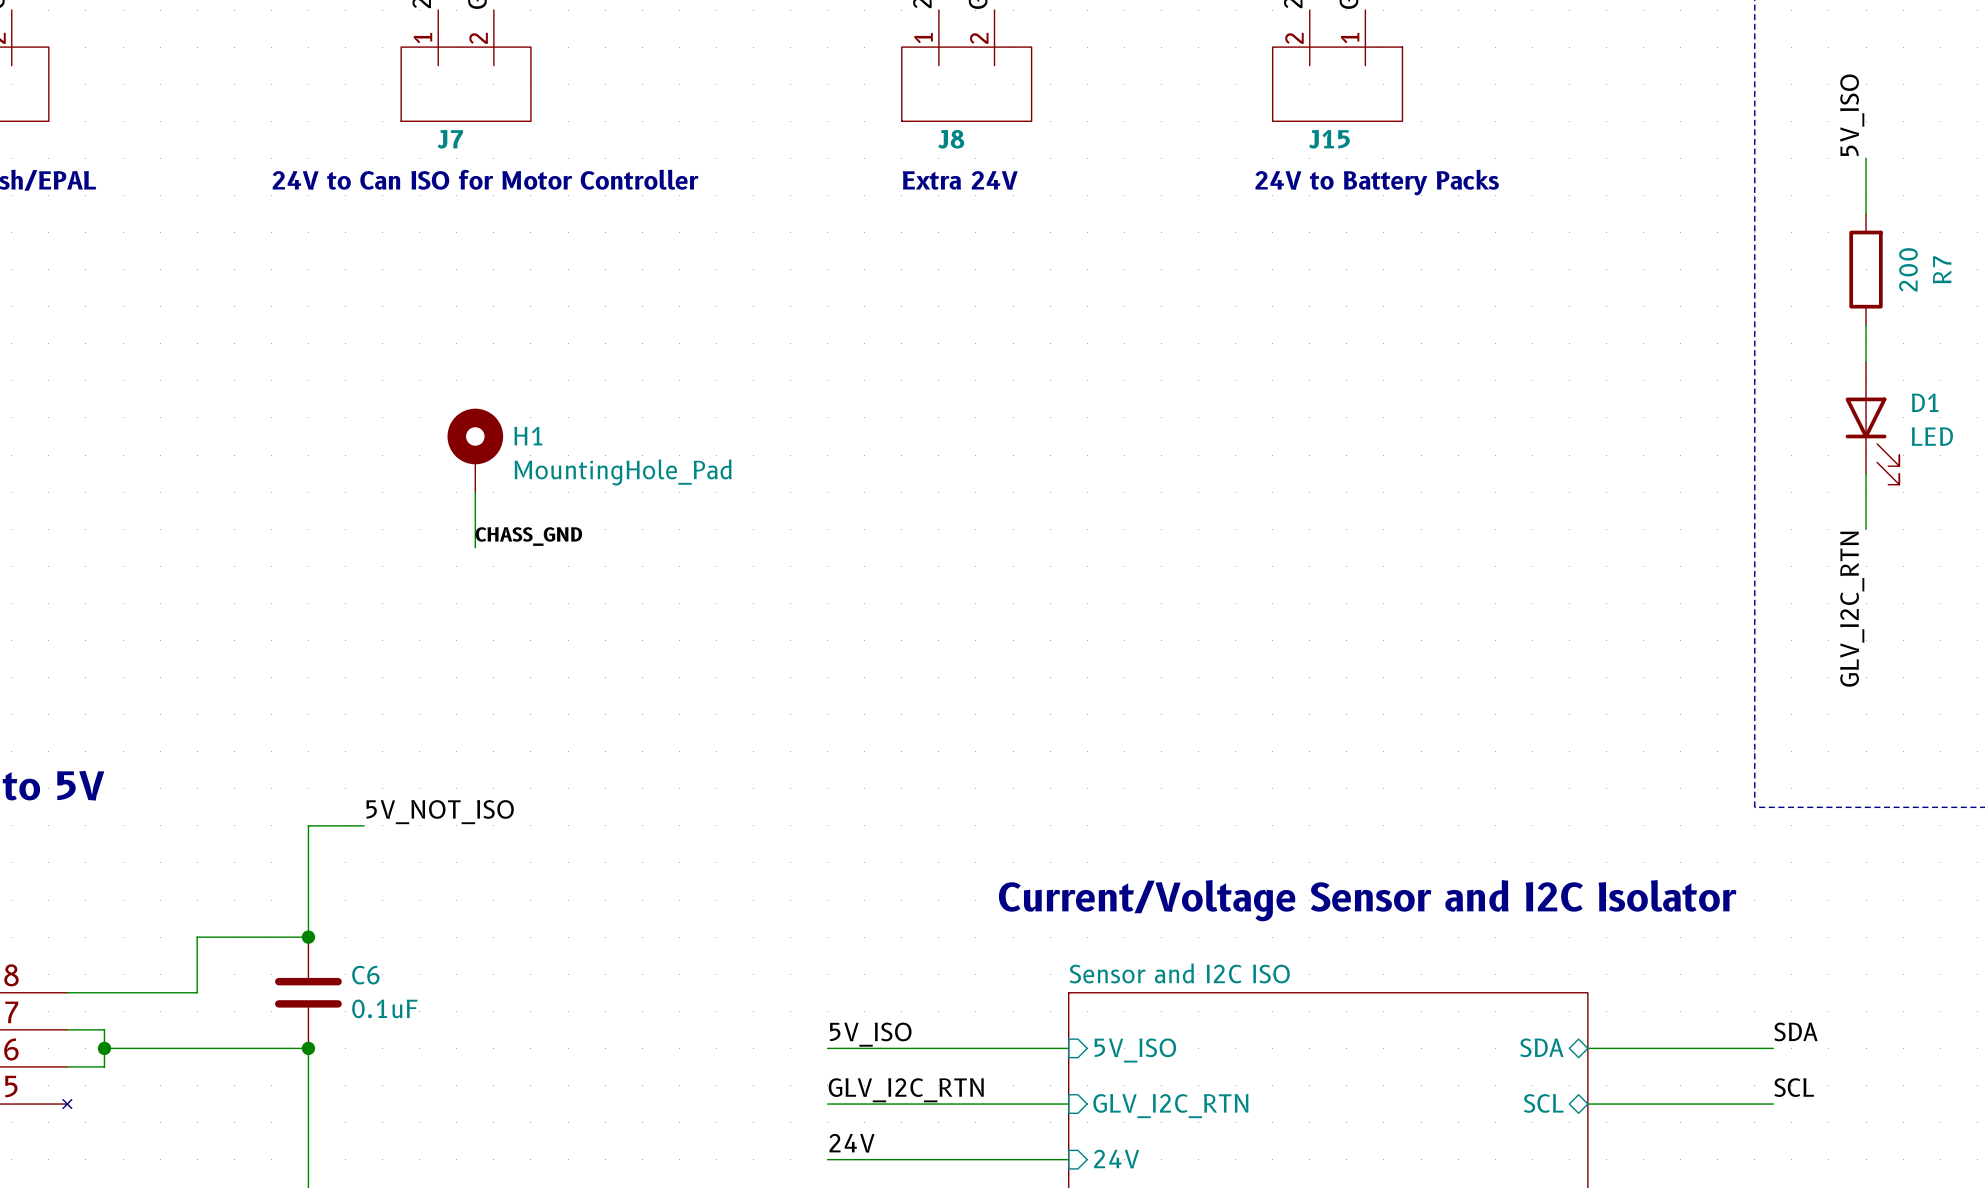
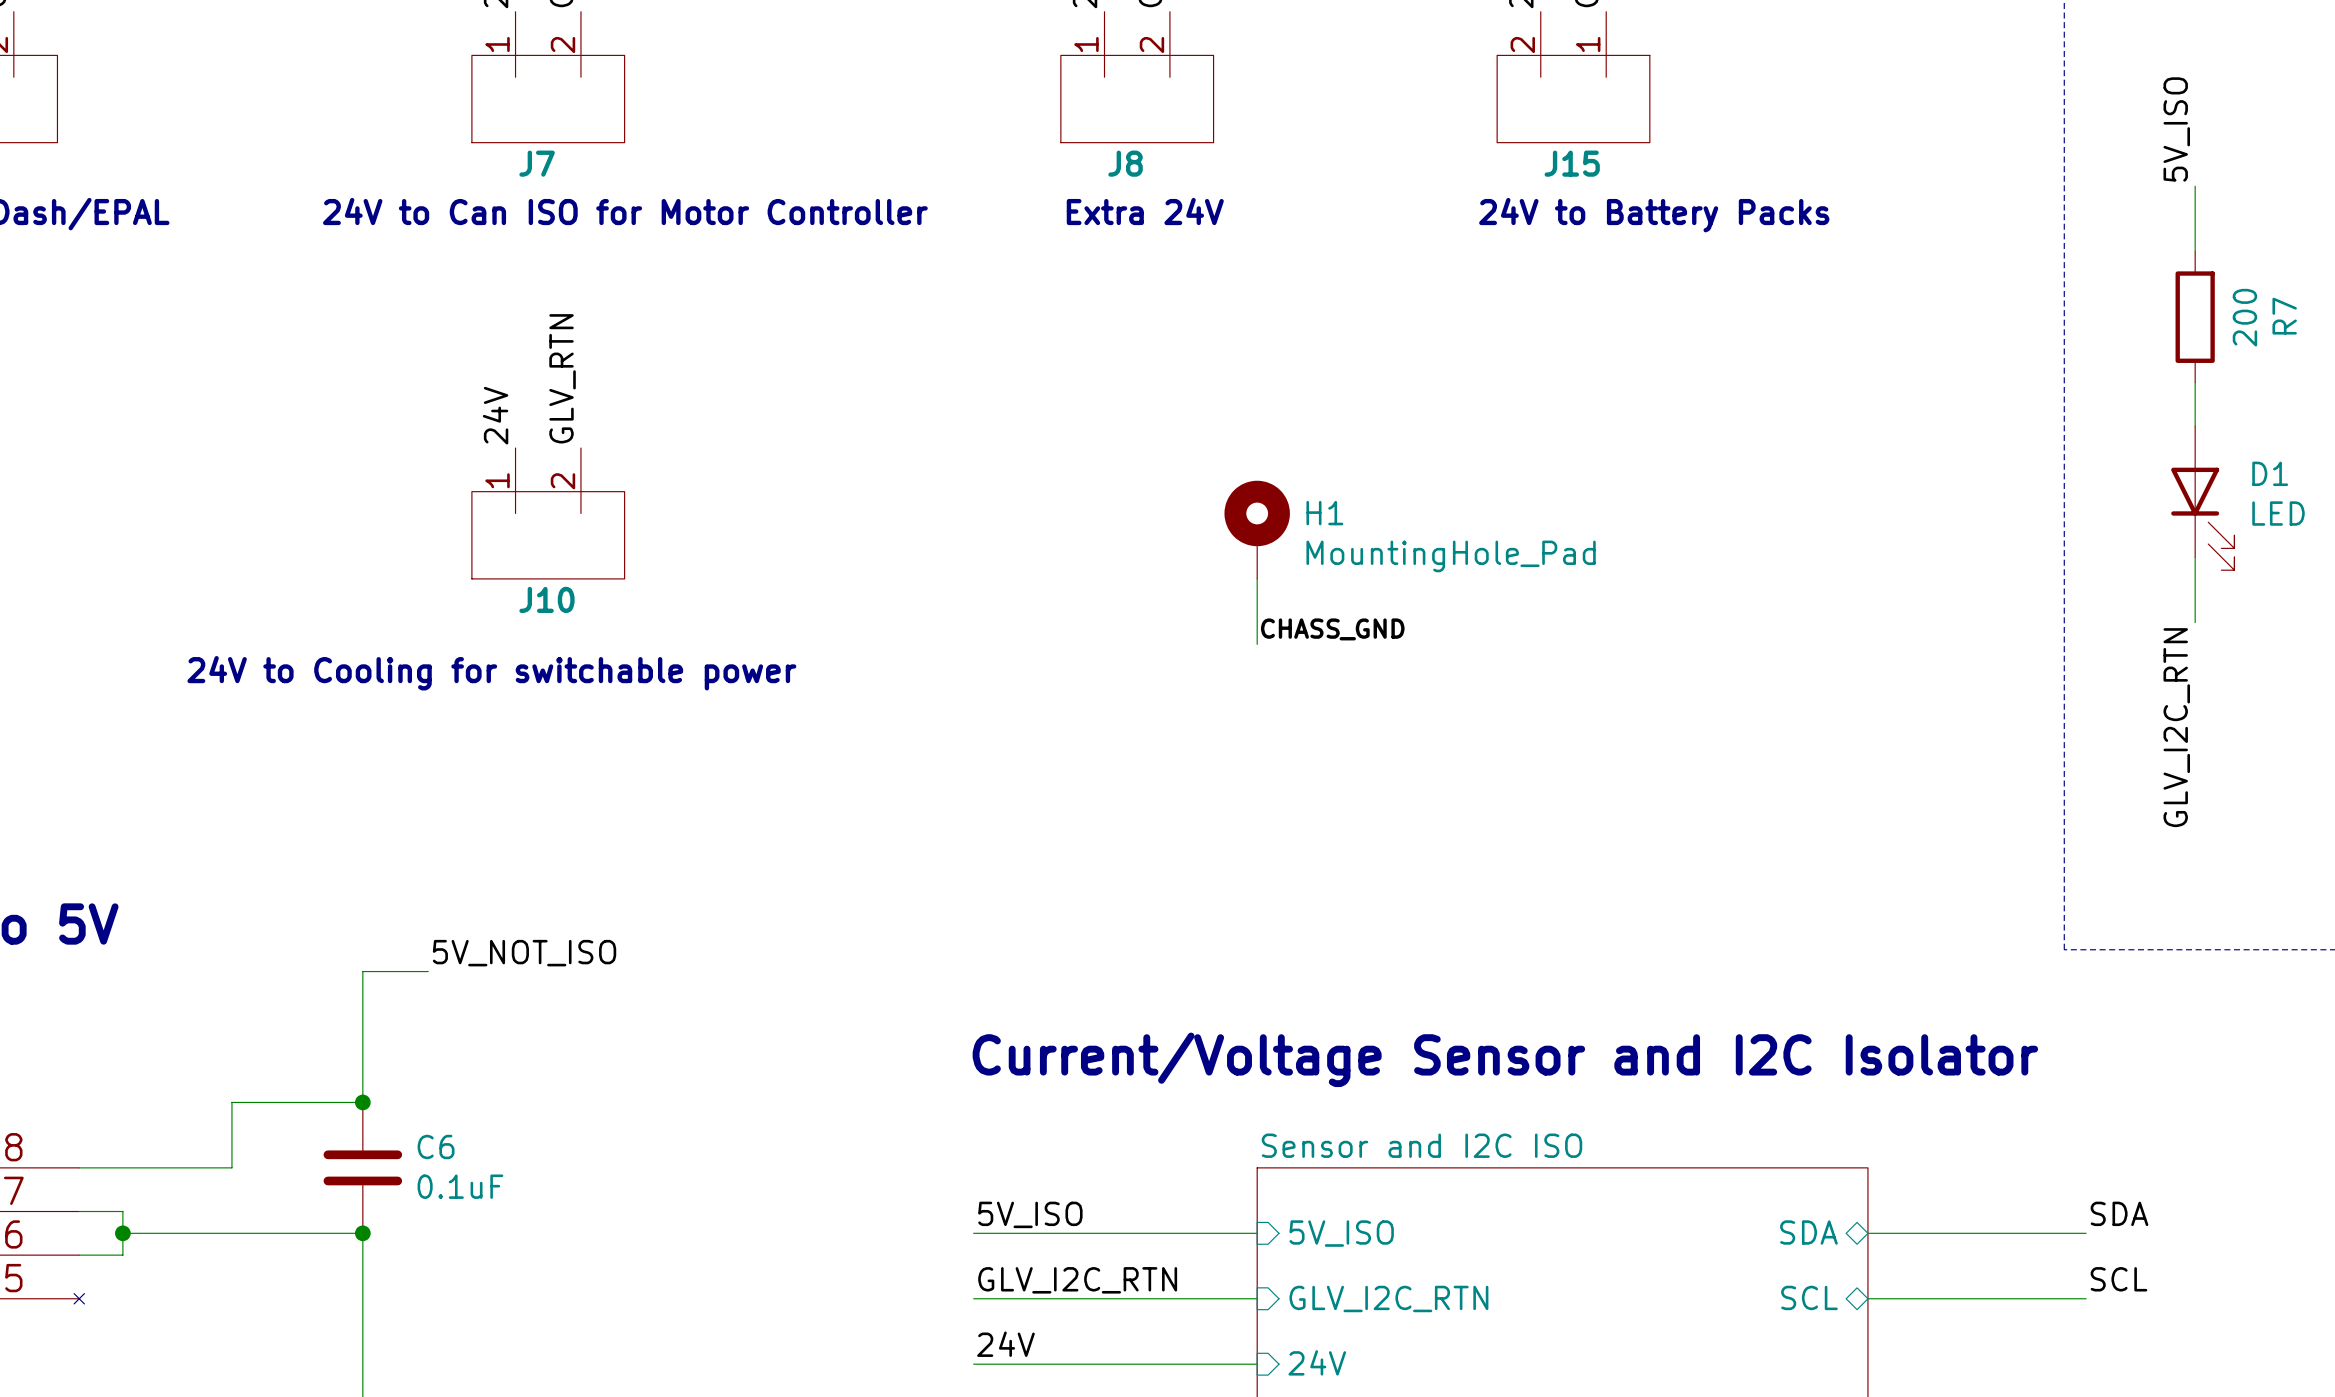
label: none -> GLV_RTN (562, 378)
label: none -> 24V (495, 415)
J10: none -> (548, 513)
H1 position: (475, 450) -> (1257, 529)
wire: (475, 492) (475, 547) -> none
wire: none -> (1257, 578) (1257, 644)
label: CHASS_GND (528, 536) -> none
label: none -> CHASS_GND (1332, 629)
text: none -> 24V to Cooling for switchable power (491, 673)

